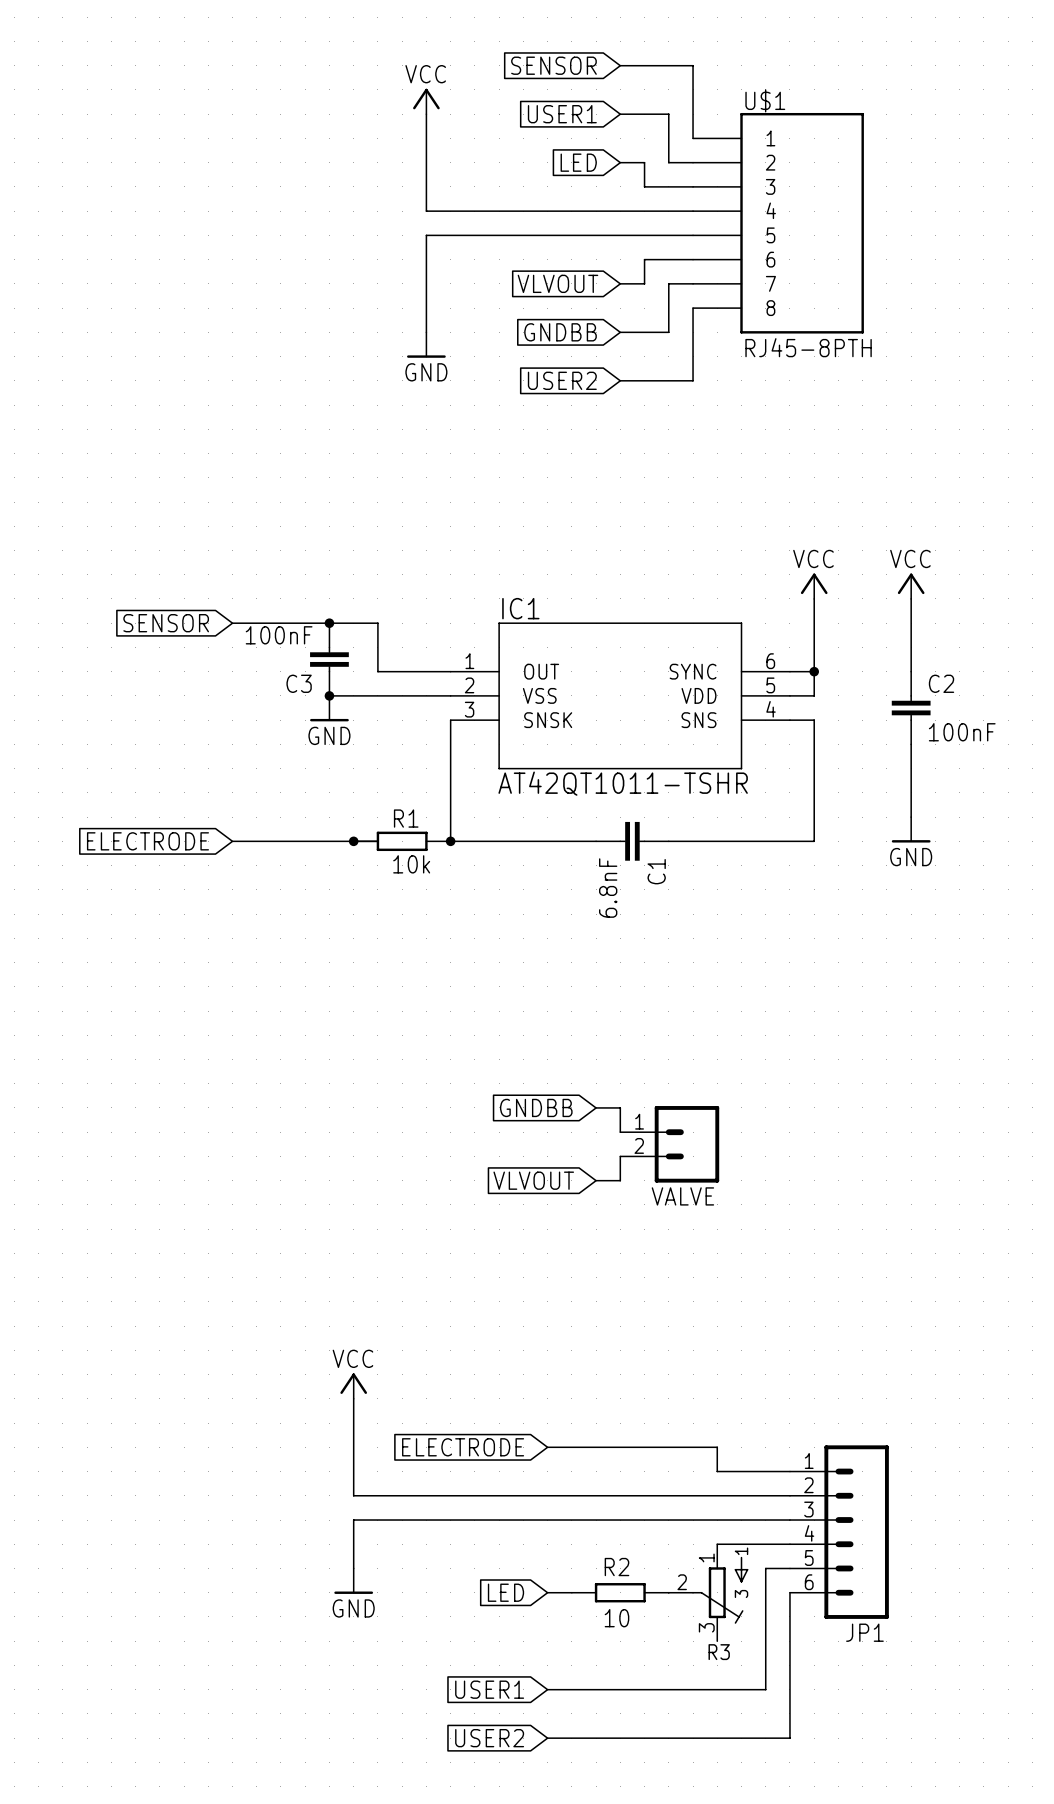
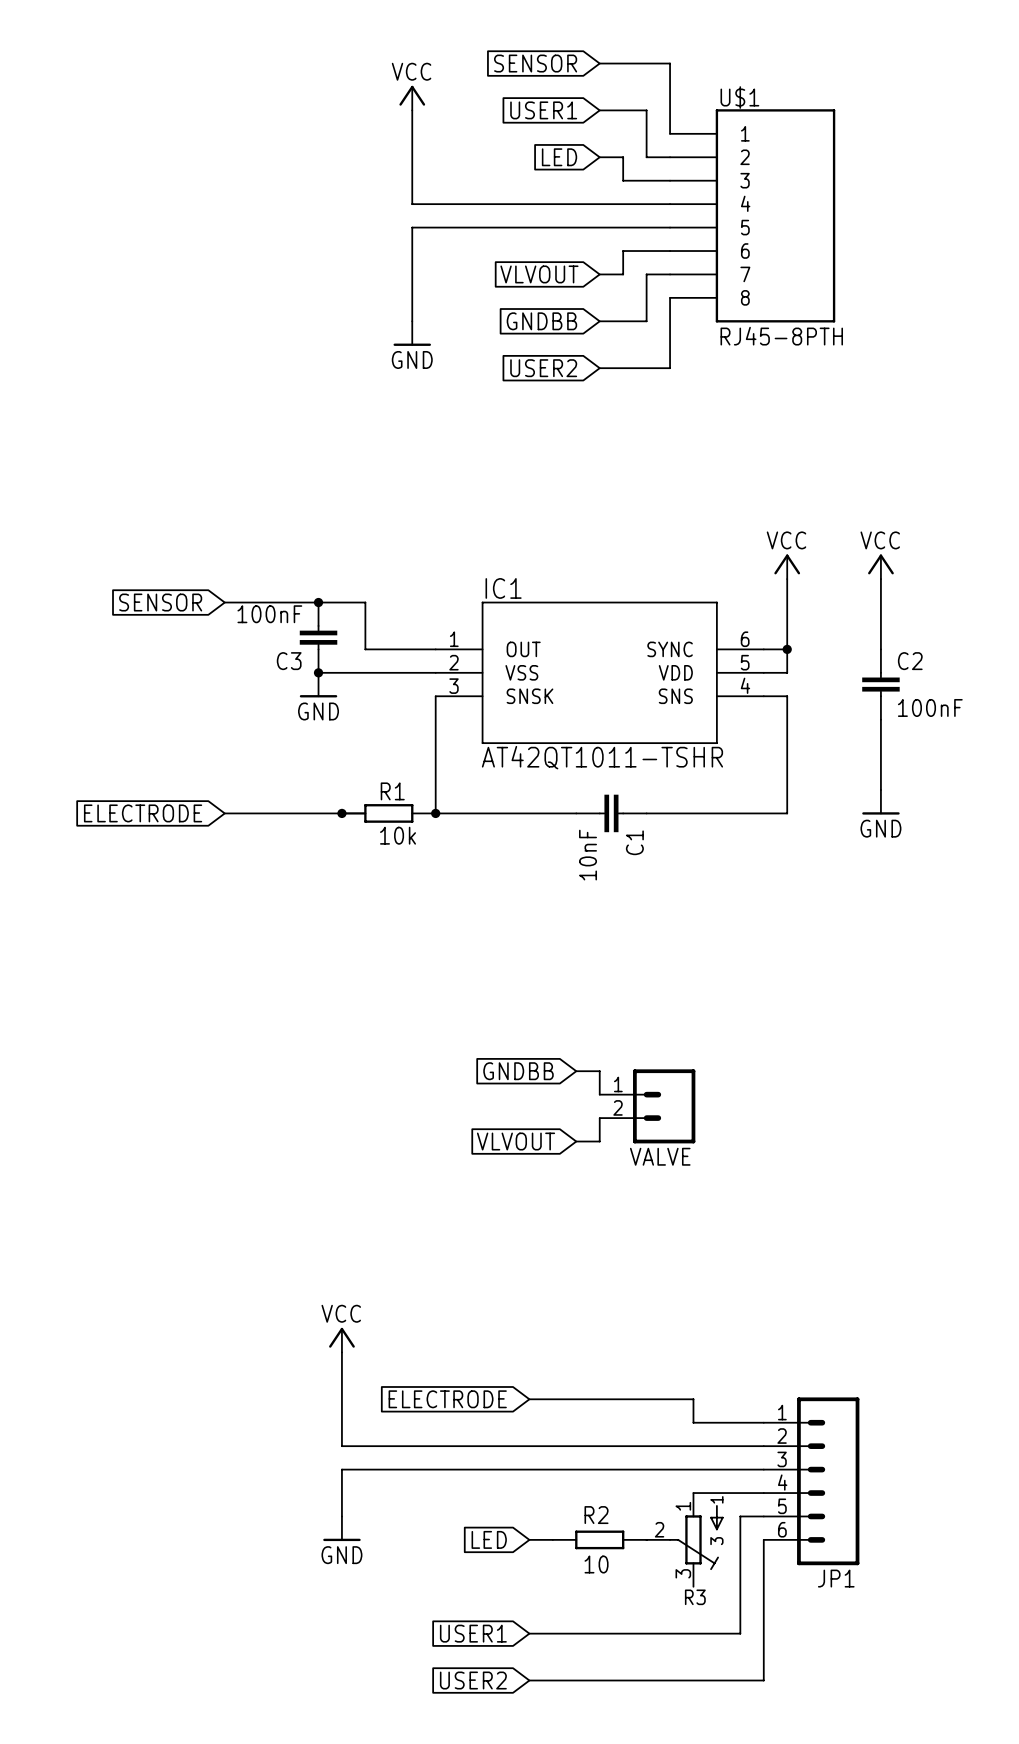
C1 value: 6.8nF (608, 888) -> 10nF (588, 855)

